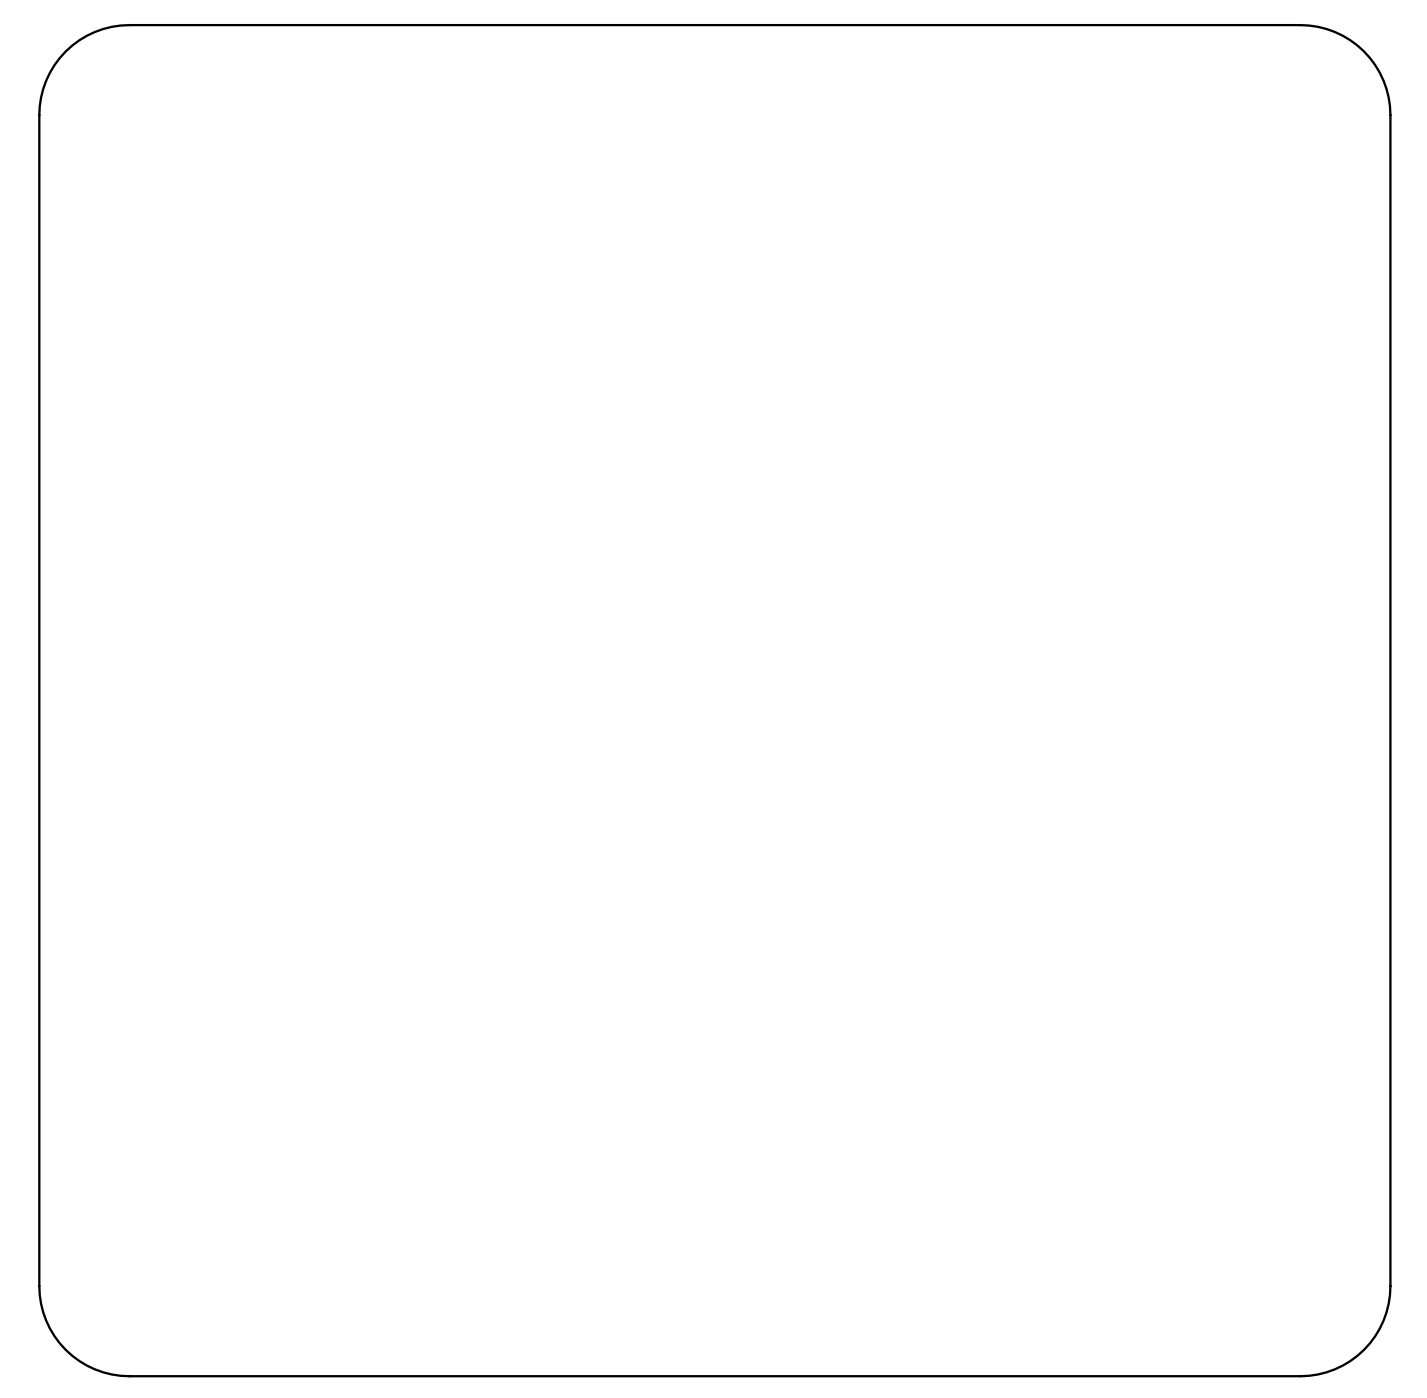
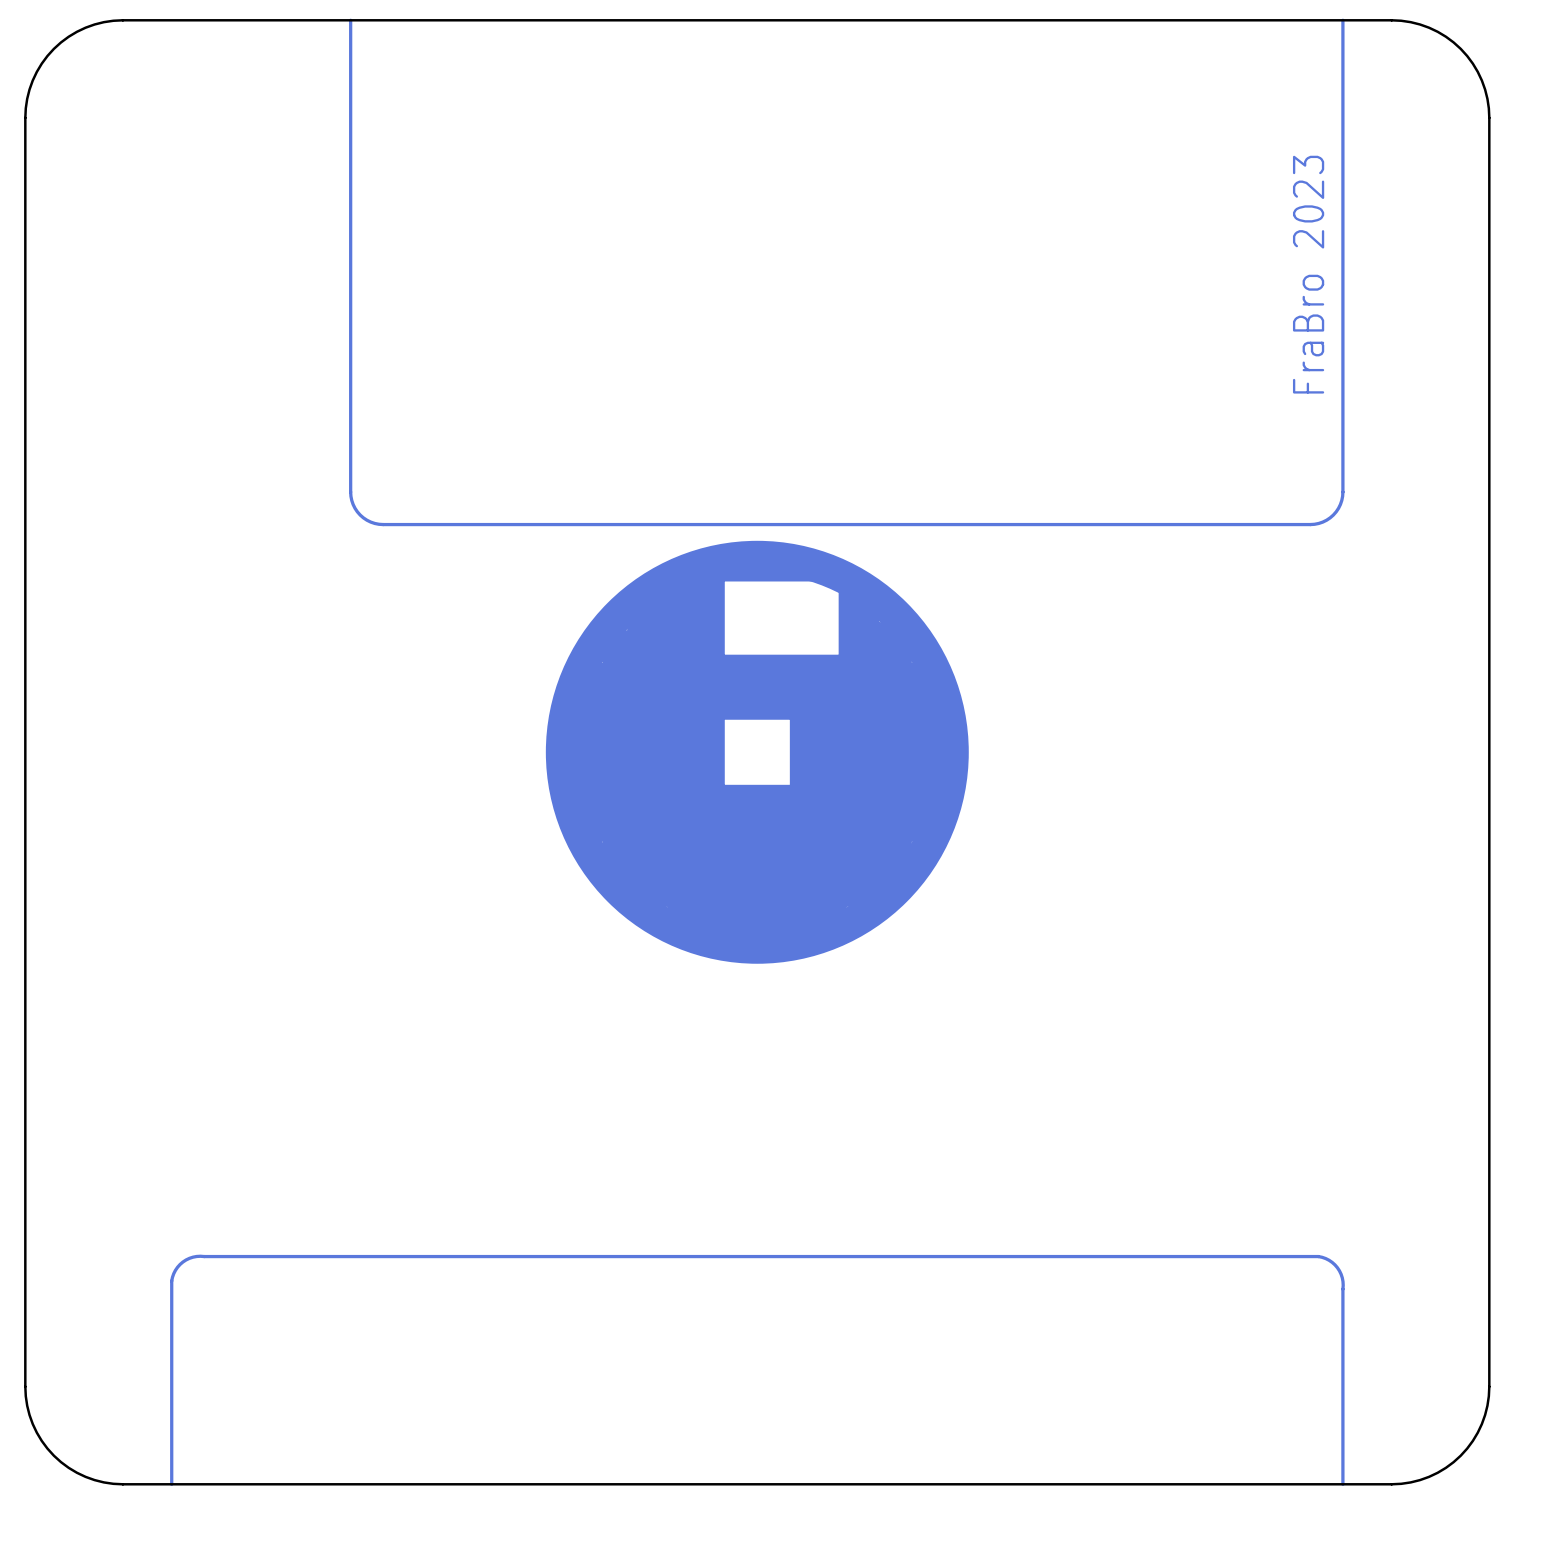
track: none -> (1342, 20) (1342, 492) (1340, 504) (1333, 515) (1322, 522) (1310, 524) (383, 524) (366, 520) (355, 508) (350, 492) (350, 20)
text: none -> FraBro 2023 (1308, 274)
drawing: none -> [545, 540, 969, 964]
track: none -> (1342, 1484) (1343, 1281) (1335, 1264) (1318, 1256) (200, 1256) (189, 1258) (180, 1264) (171, 1280) (171, 1484)

